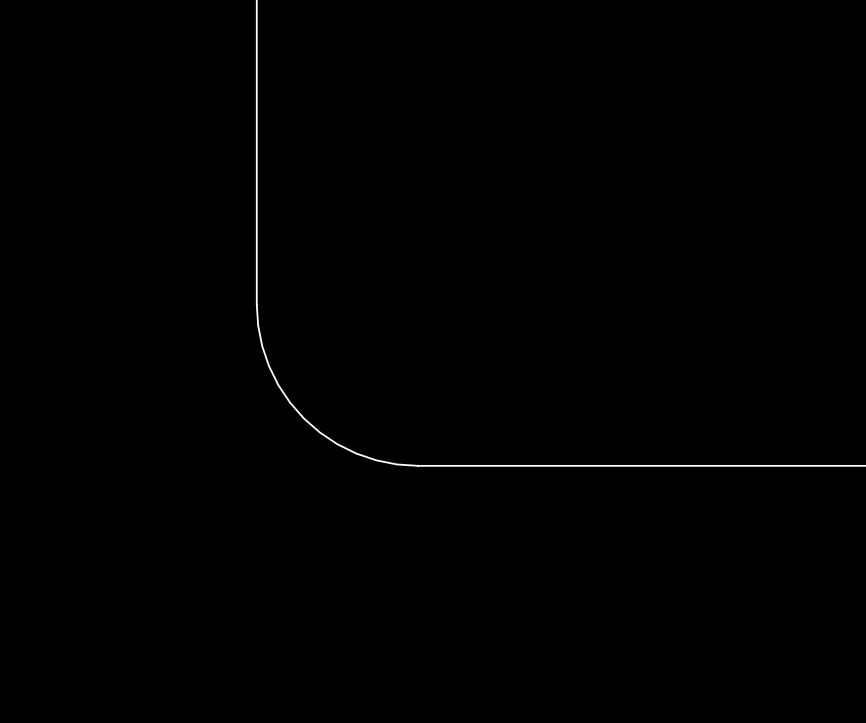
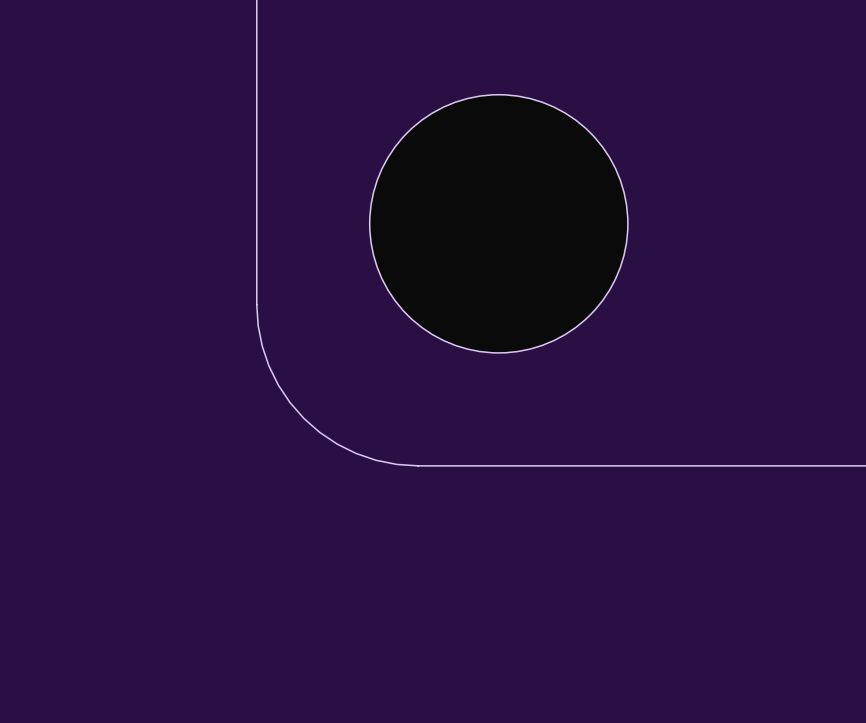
hole: none -> (498, 223)

